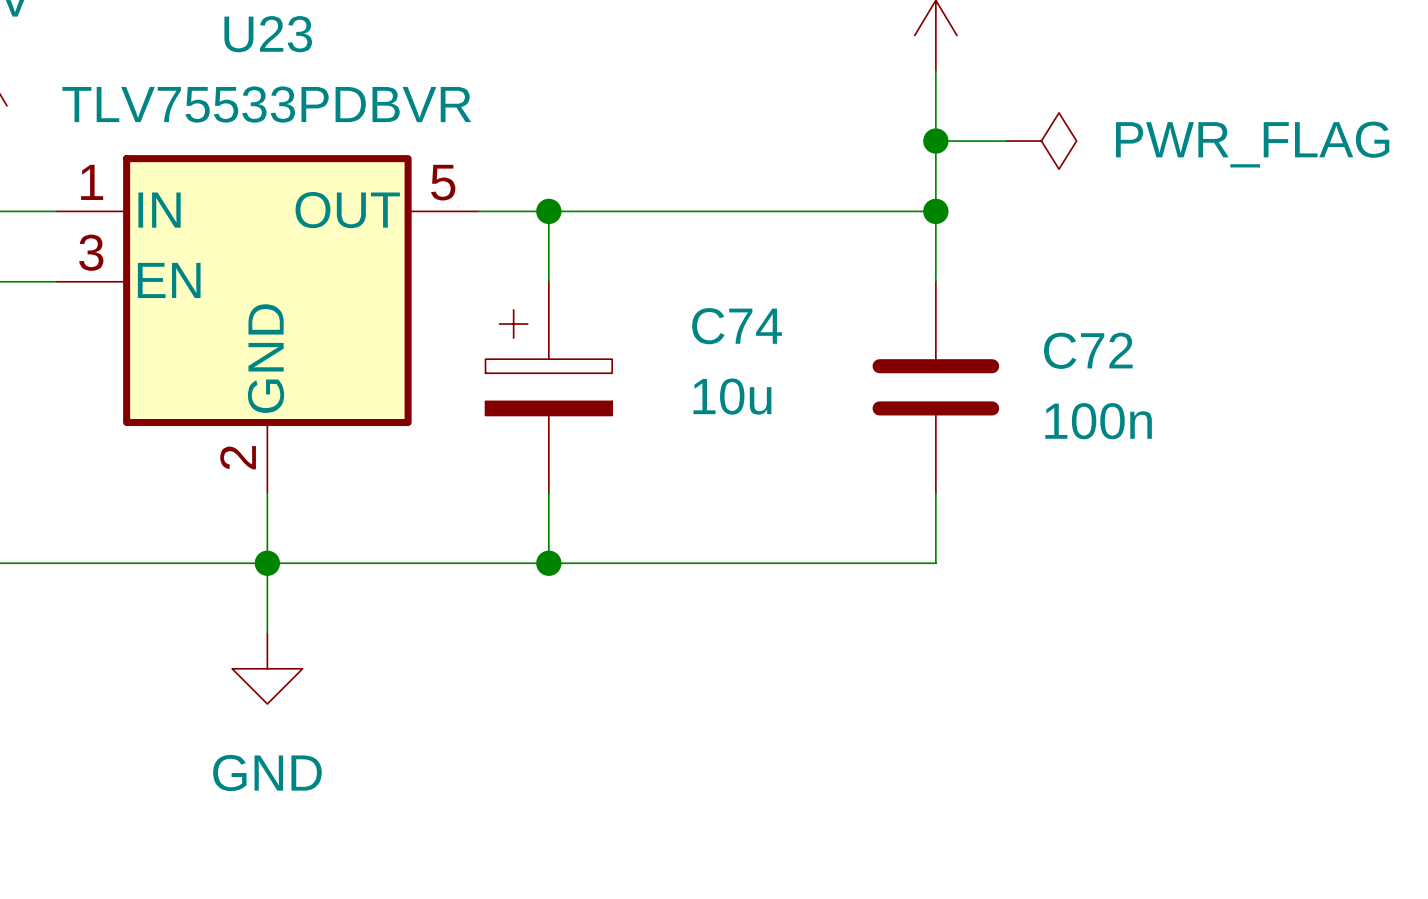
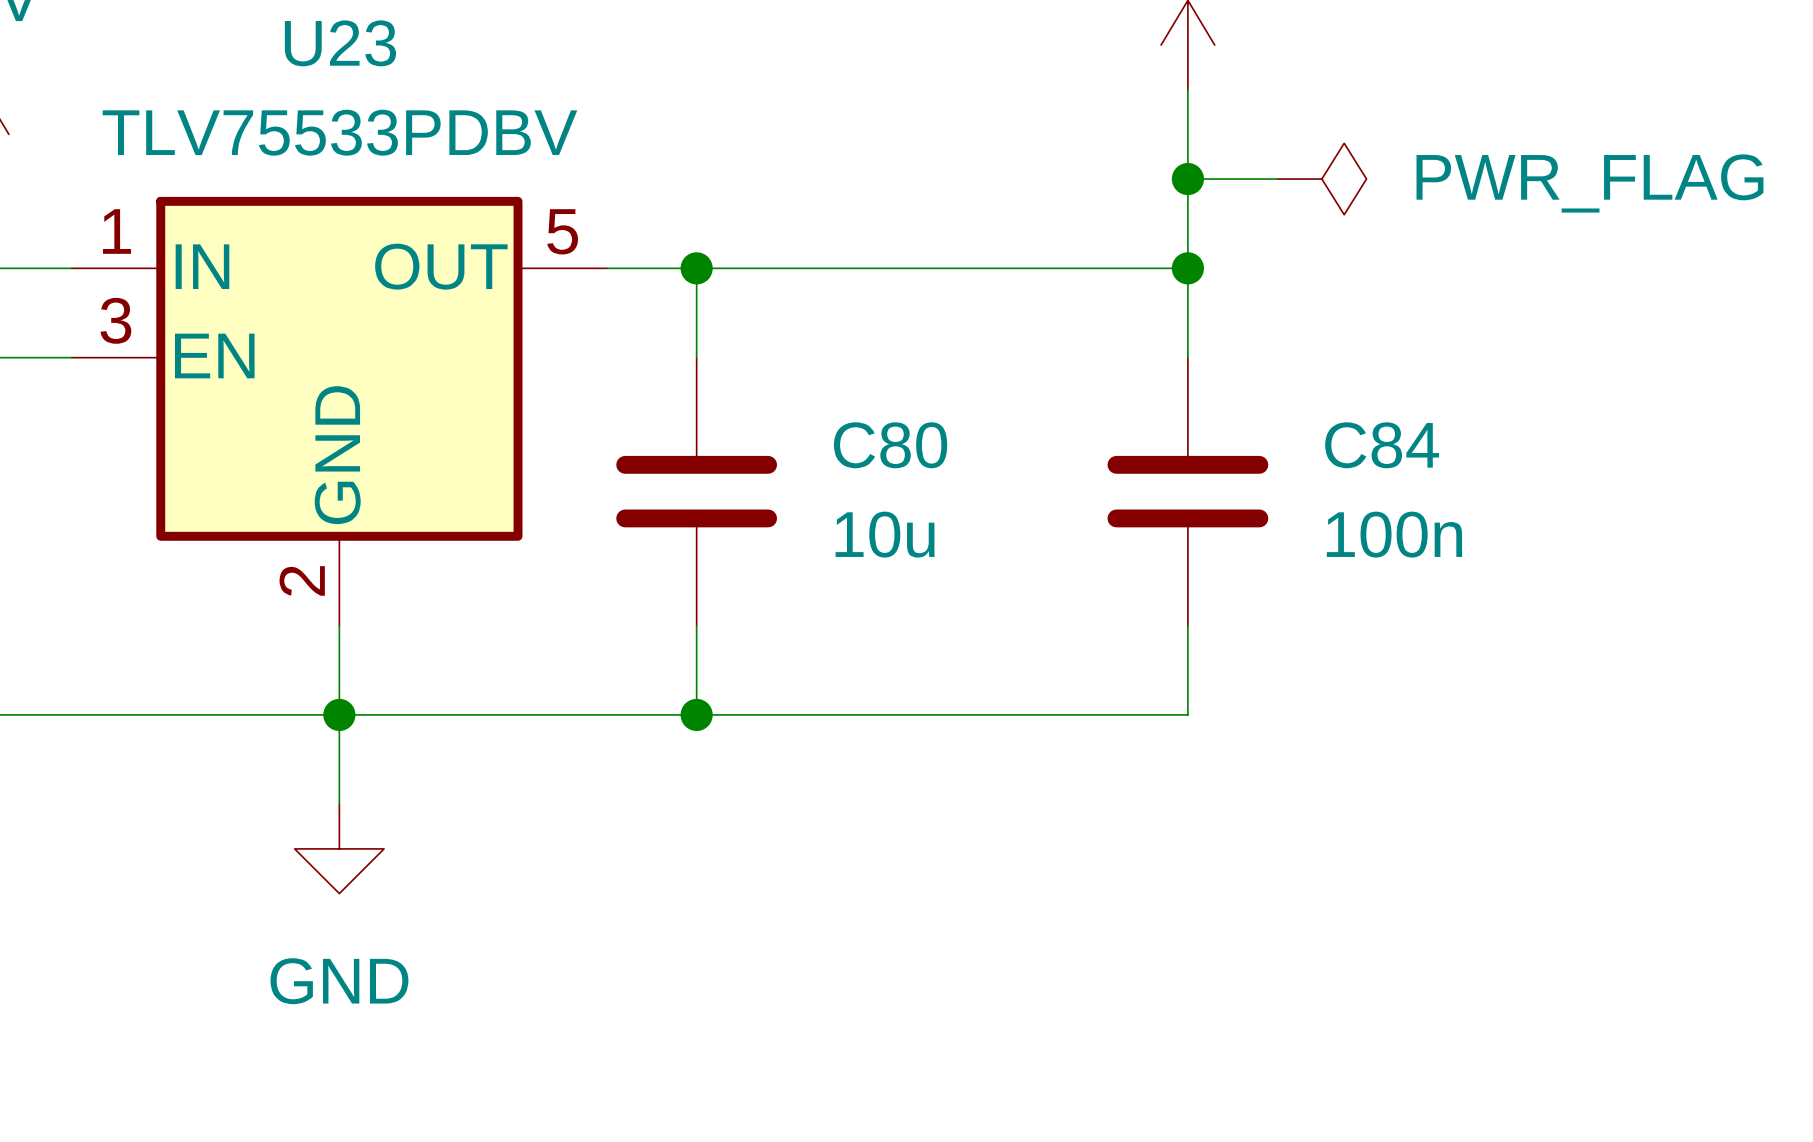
U23 value: TLV75533PDBVR (266, 104) -> TLV75533PDBV (339, 132)
C72 name: C72 (1088, 350) -> C84 (1382, 445)
C74: 10u (548, 387) -> none
C80: none -> 10u (696, 491)

